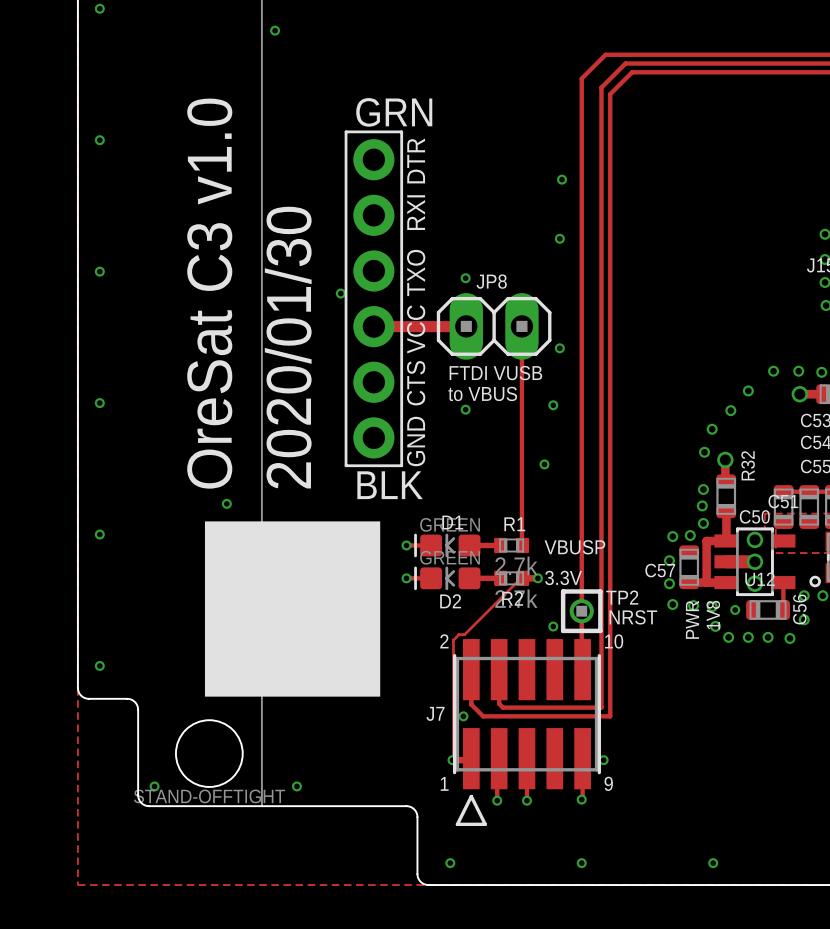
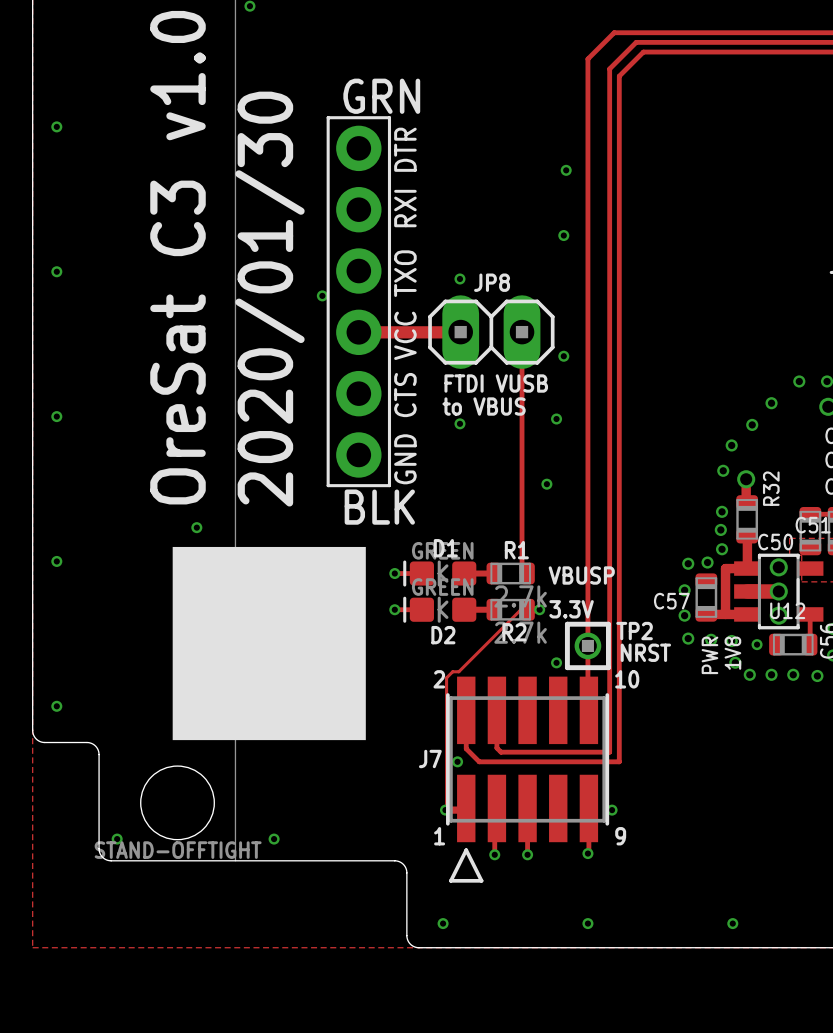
R1 footprint: [494, 537, 530, 554] -> [486, 562, 535, 585]
R2 footprint: [494, 570, 530, 587] -> [486, 598, 535, 621]

